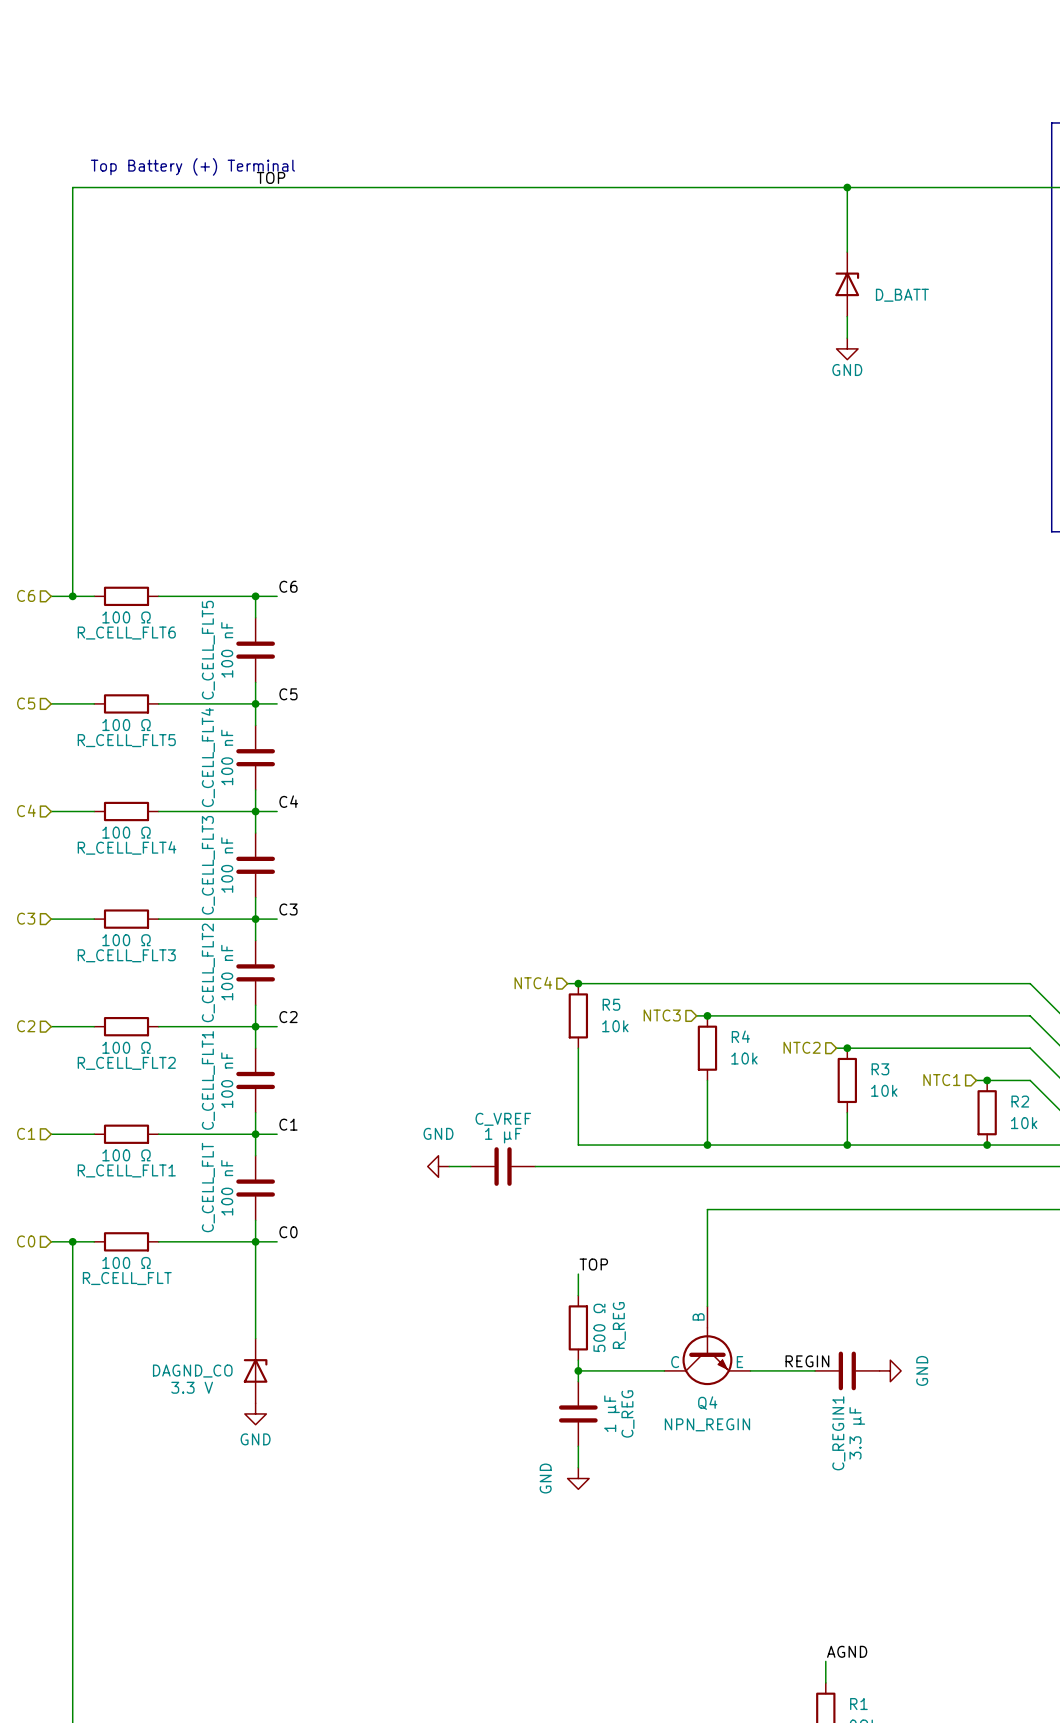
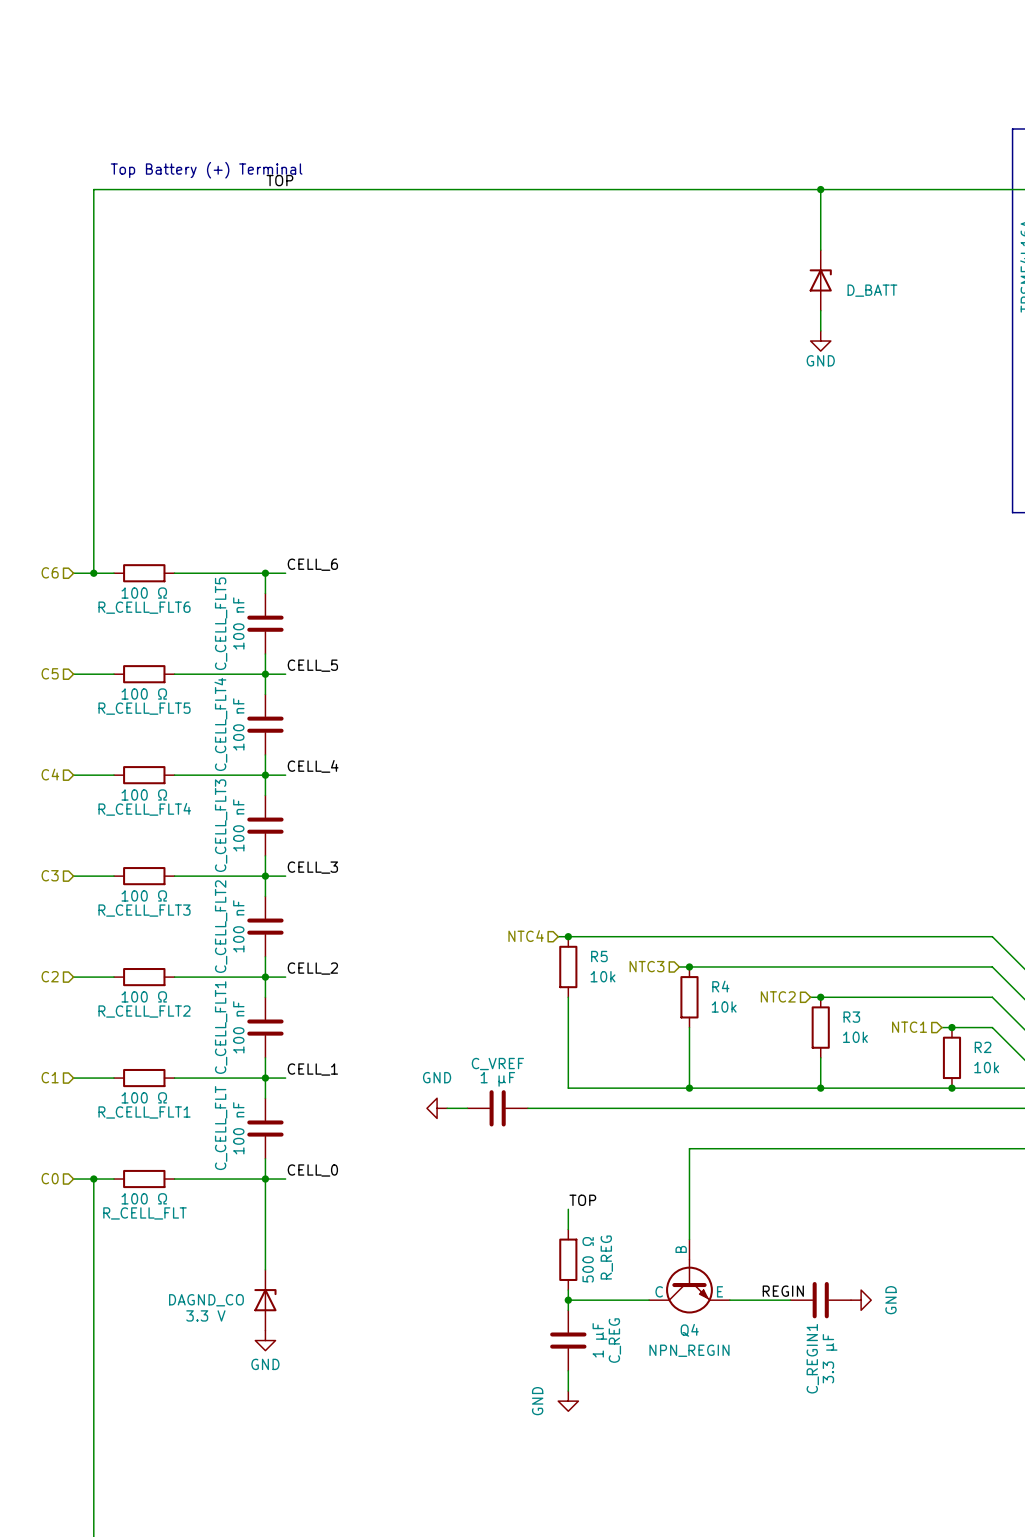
label: C6 (288, 586) -> CELL_6 (312, 564)
label: C5 (288, 694) -> CELL_5 (312, 665)
label: C4 (288, 801) -> CELL_4 (313, 766)
label: C3 (288, 909) -> CELL_3 (312, 867)
label: C2 (288, 1017) -> CELL_2 (312, 968)
label: C1 (288, 1124) -> CELL_1 (312, 1069)
label: C0 (288, 1232) -> CELL_0 (312, 1170)

